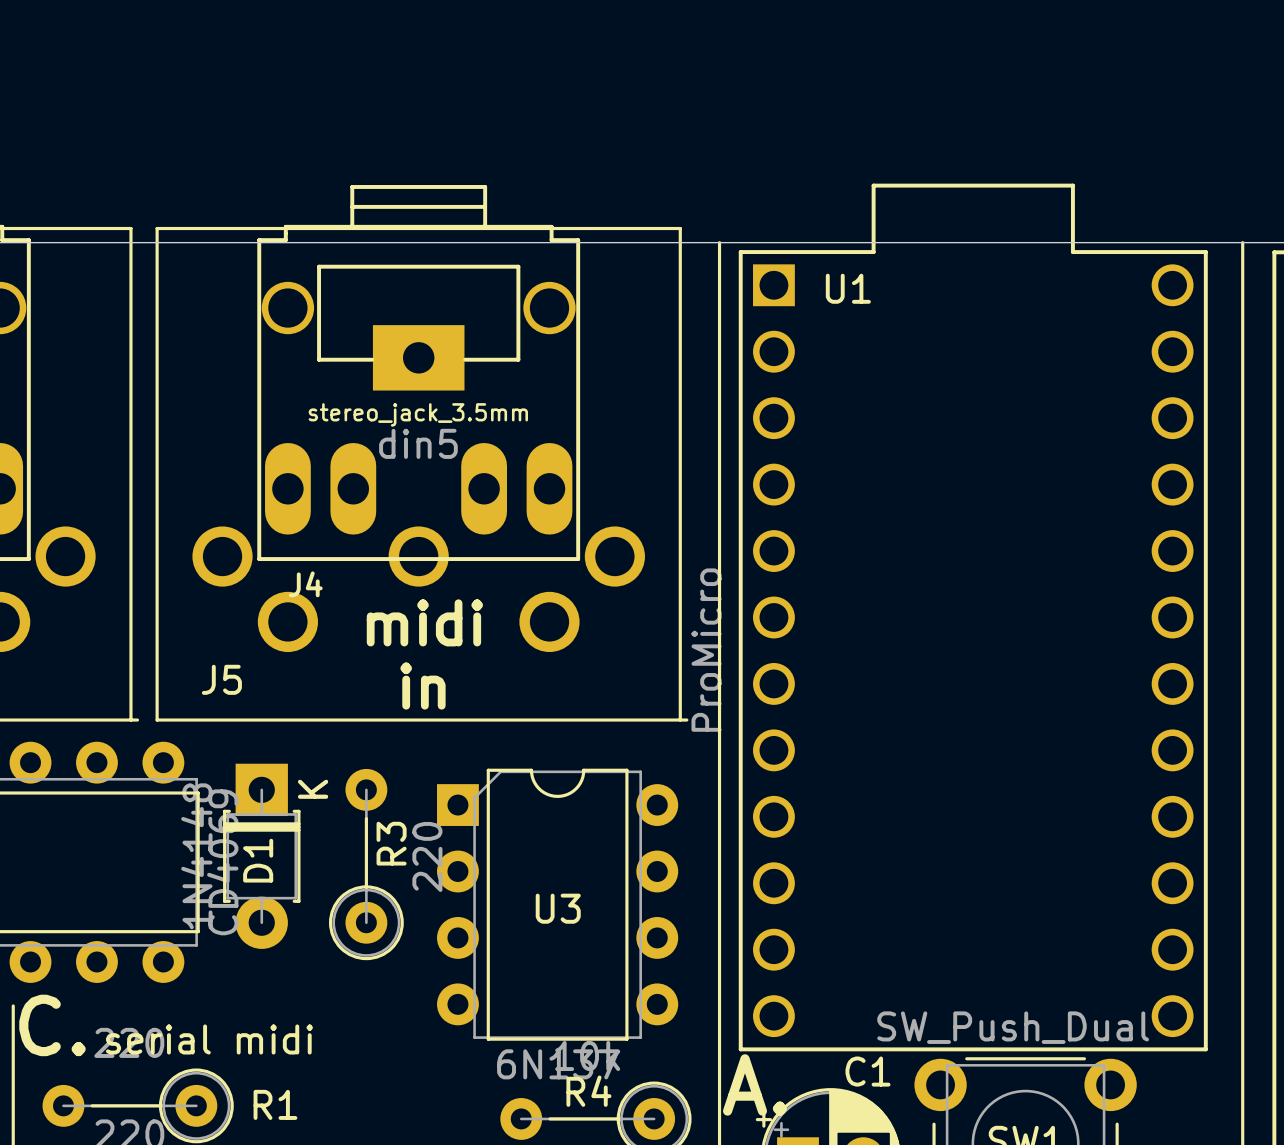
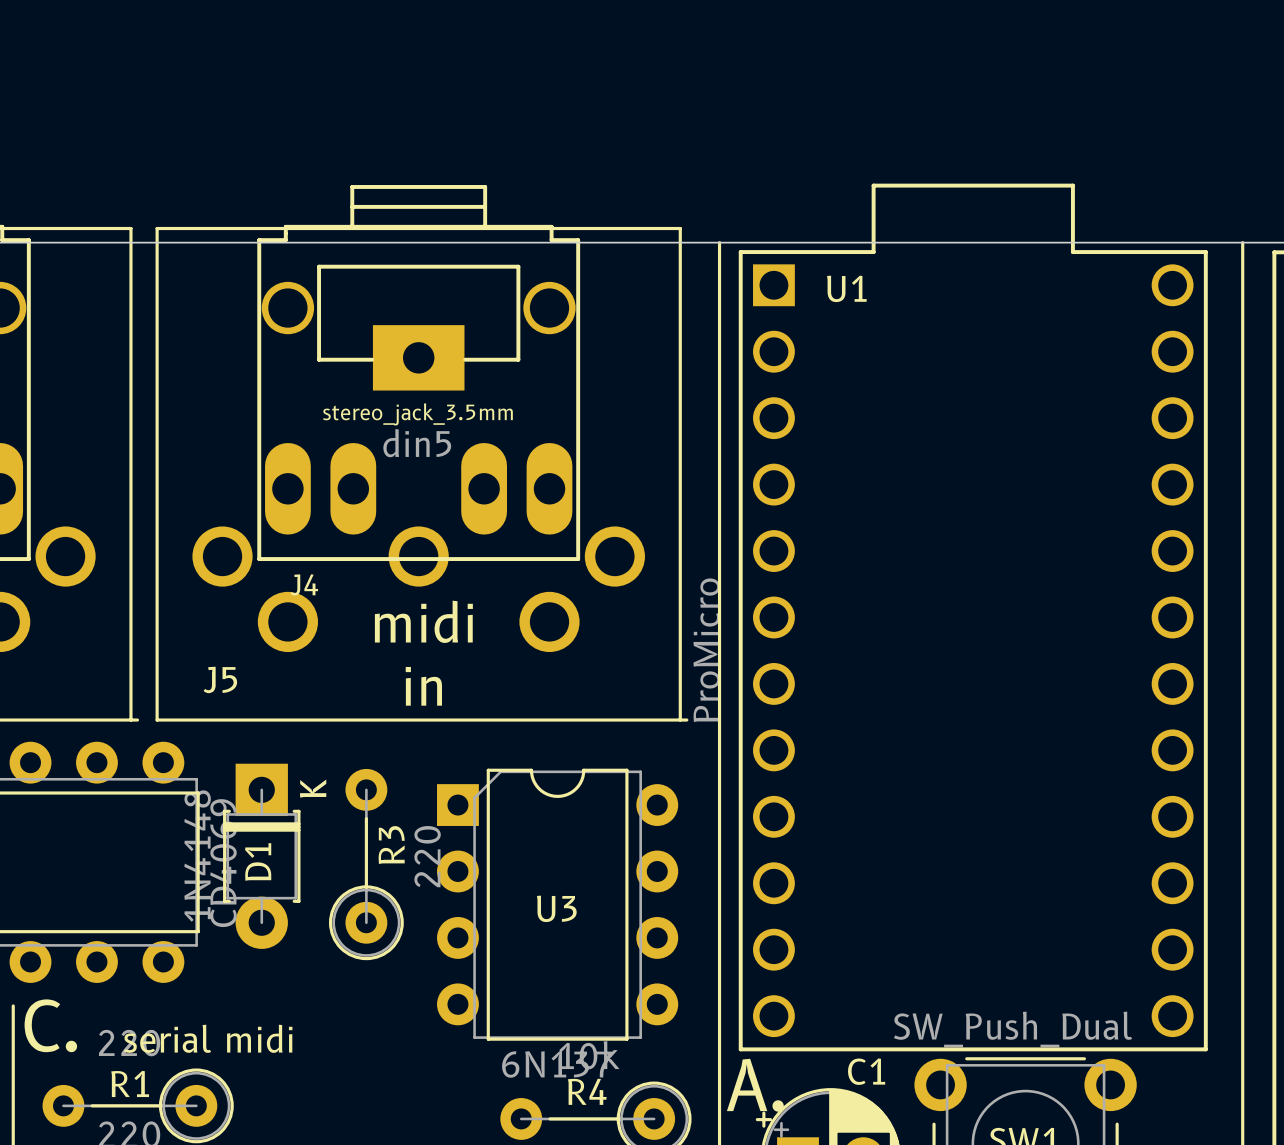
R1 name position: R1 (275, 1104) -> R1 (130, 1083)

